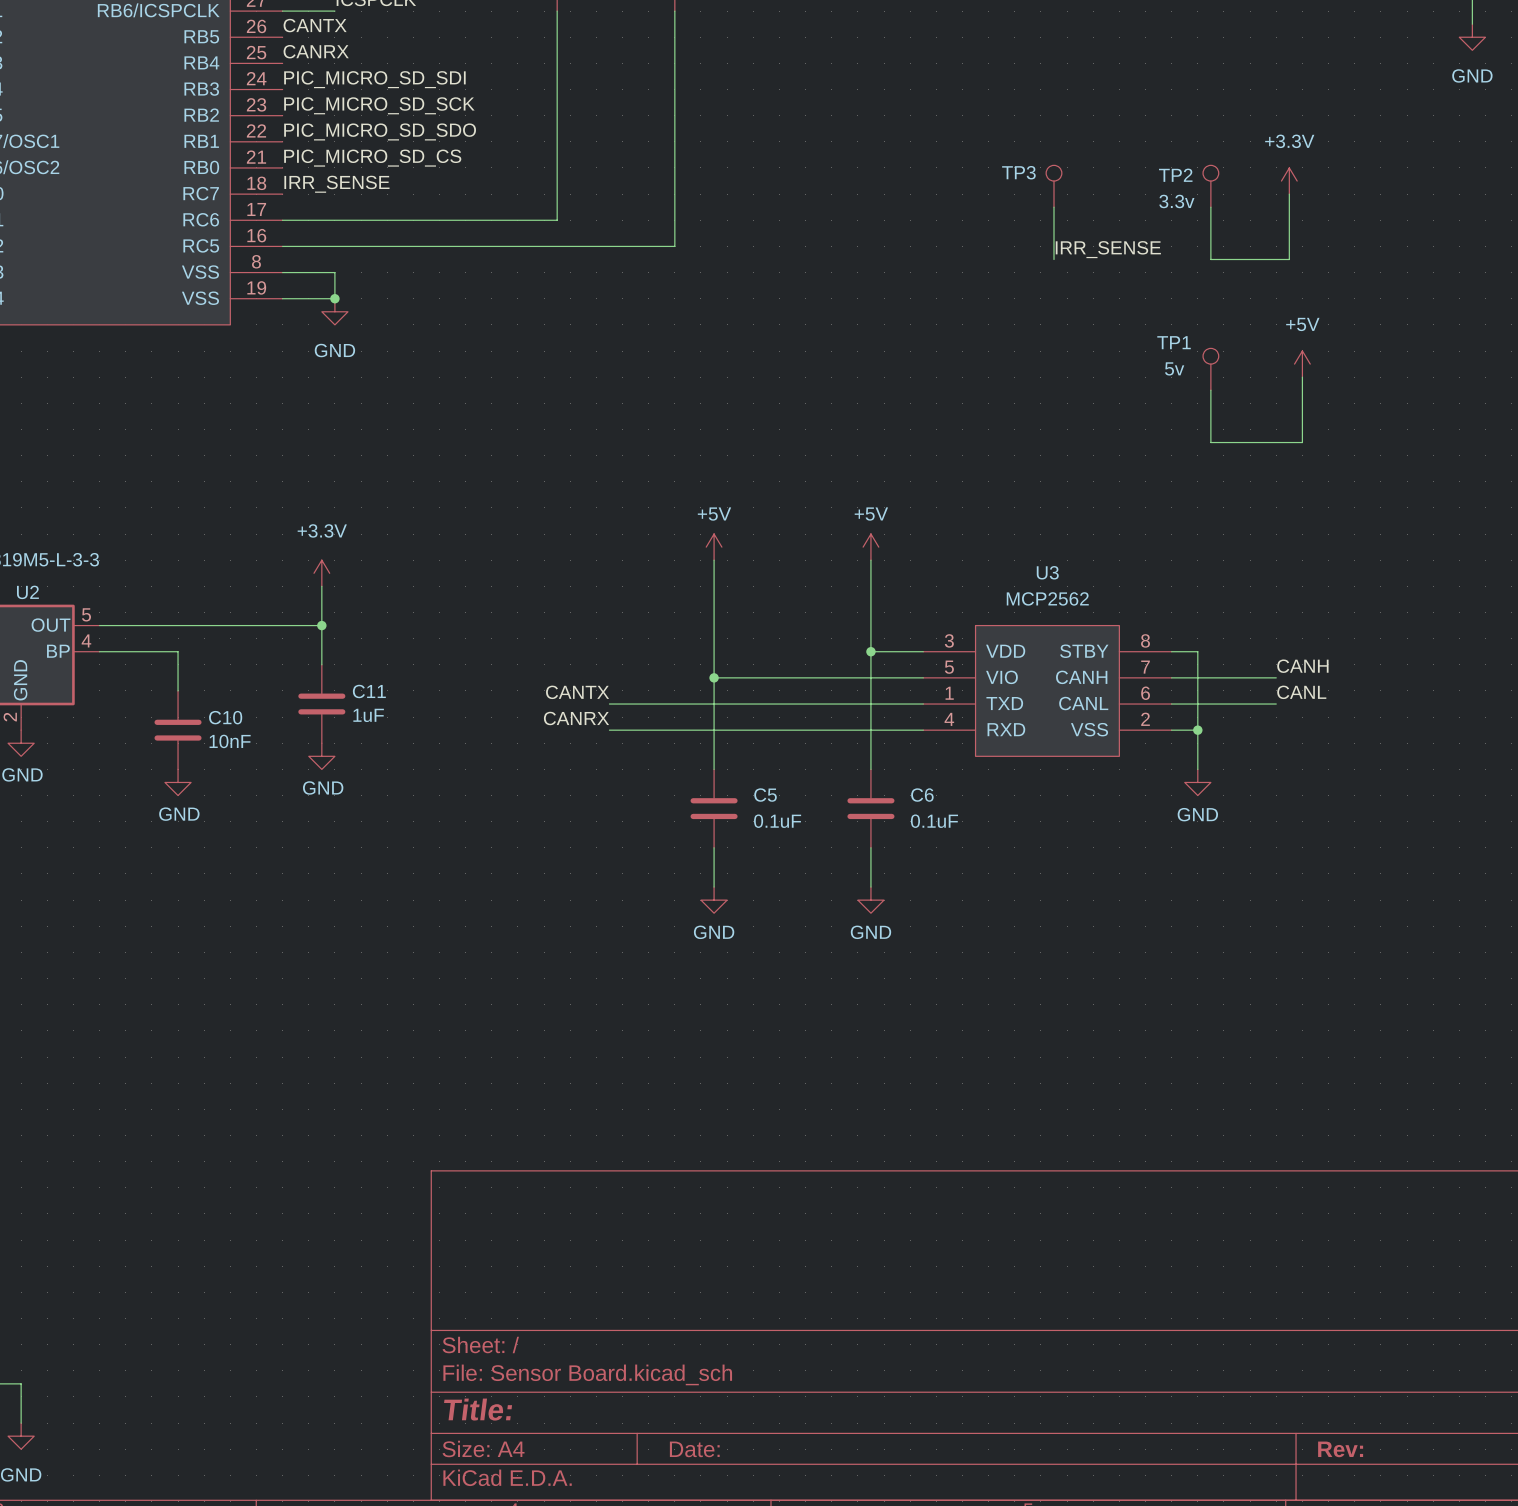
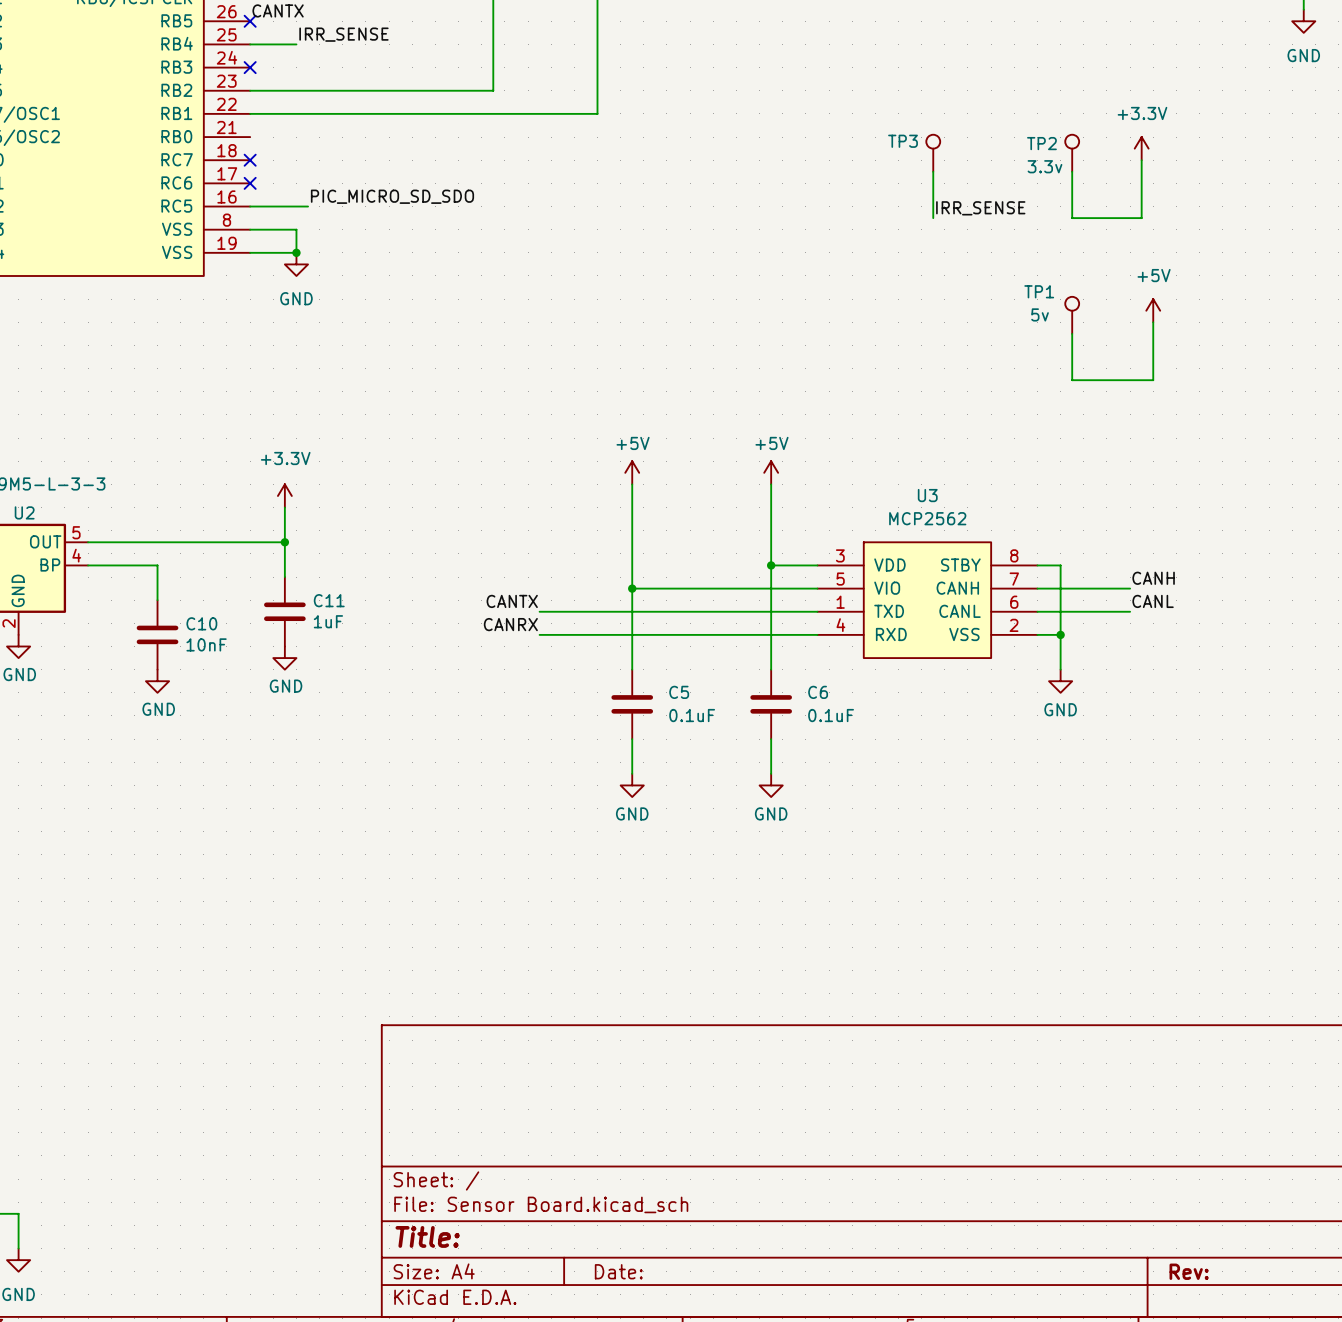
no-connect mark: none -> (250, 21)
label: CANRX (316, 51) -> none
wire: none -> (250, 44) (296, 44)
label: PIC_MICRO_SD_SDI (374, 79) -> none
no-connect mark: none -> (250, 67)
label: PIC_MICRO_SD_SCK (379, 105) -> none
wire: (557, 115) (557, 220) (282, 220) -> (493, 90) (250, 90)
label position: PIC_MICRO_SD_SDO (380, 131) -> PIC_MICRO_SD_SDO (392, 196)
wire: (674, 141) (674, 246) (347, 246) -> (597, 113) (250, 113)
label: PIC_MICRO_SD_CS (372, 158) -> none
label position: IRR_SENSE (336, 184) -> IRR_SENSE (343, 34)
no-connect mark: none -> (250, 160)
no-connect mark: none -> (250, 183)

